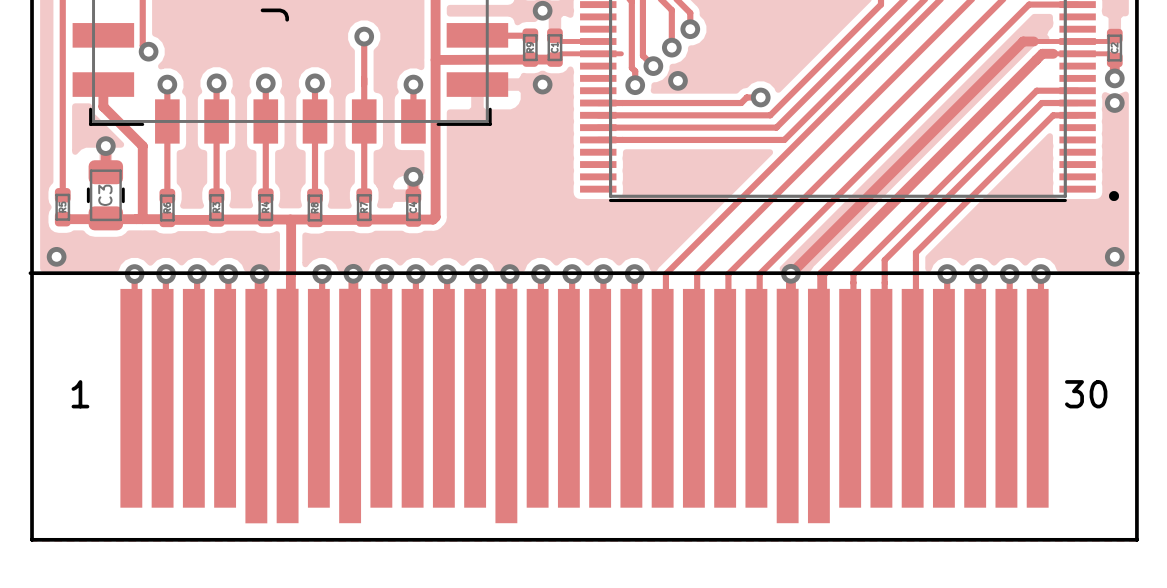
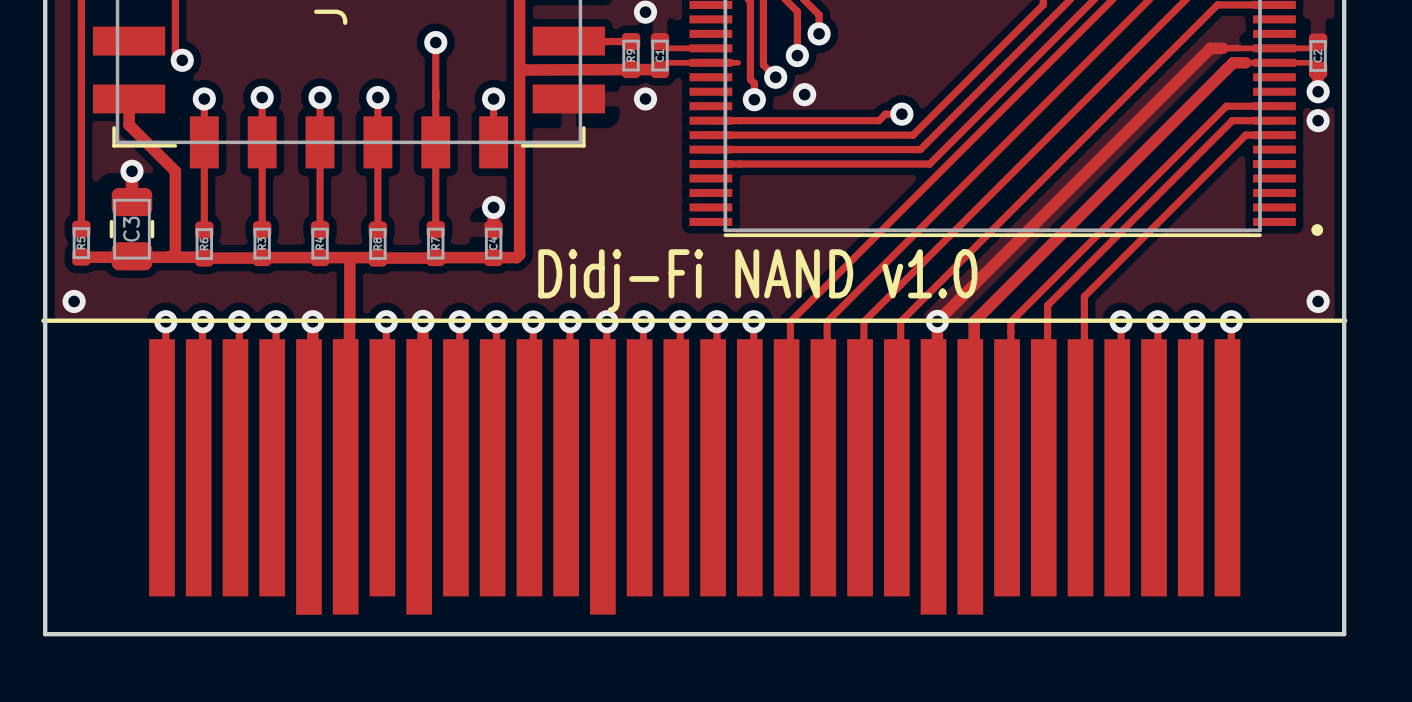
text: none -> Didj-Fi NAND v1.0 (757, 281)
part text: 1 (80, 394) -> none
part text: 30 (1086, 394) -> none

